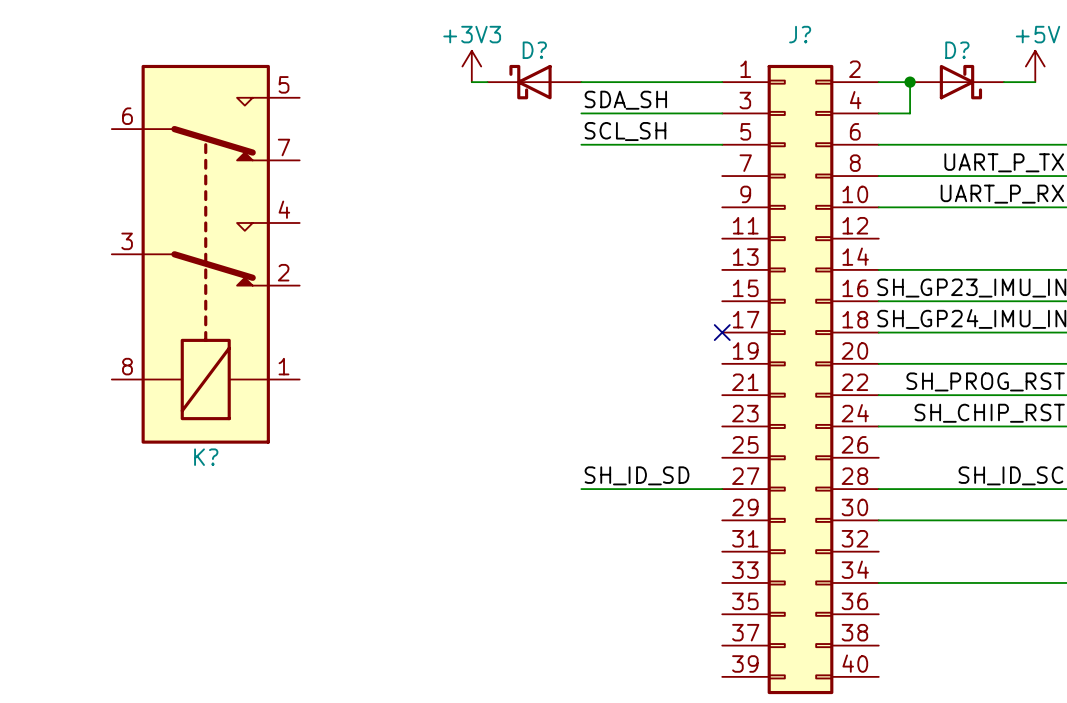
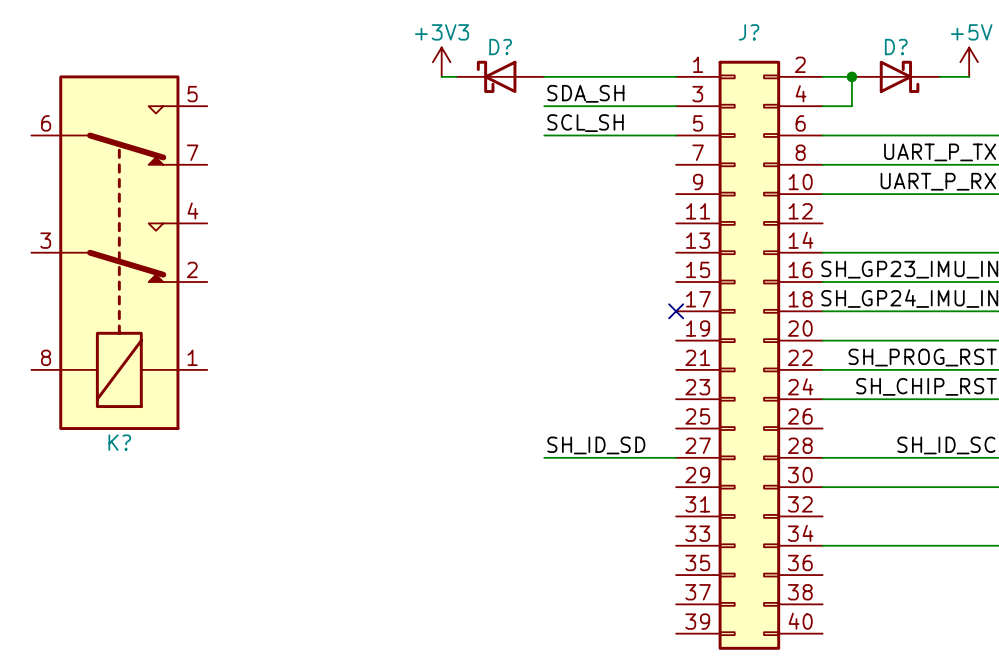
K? position: (205, 254) -> (119, 252)

